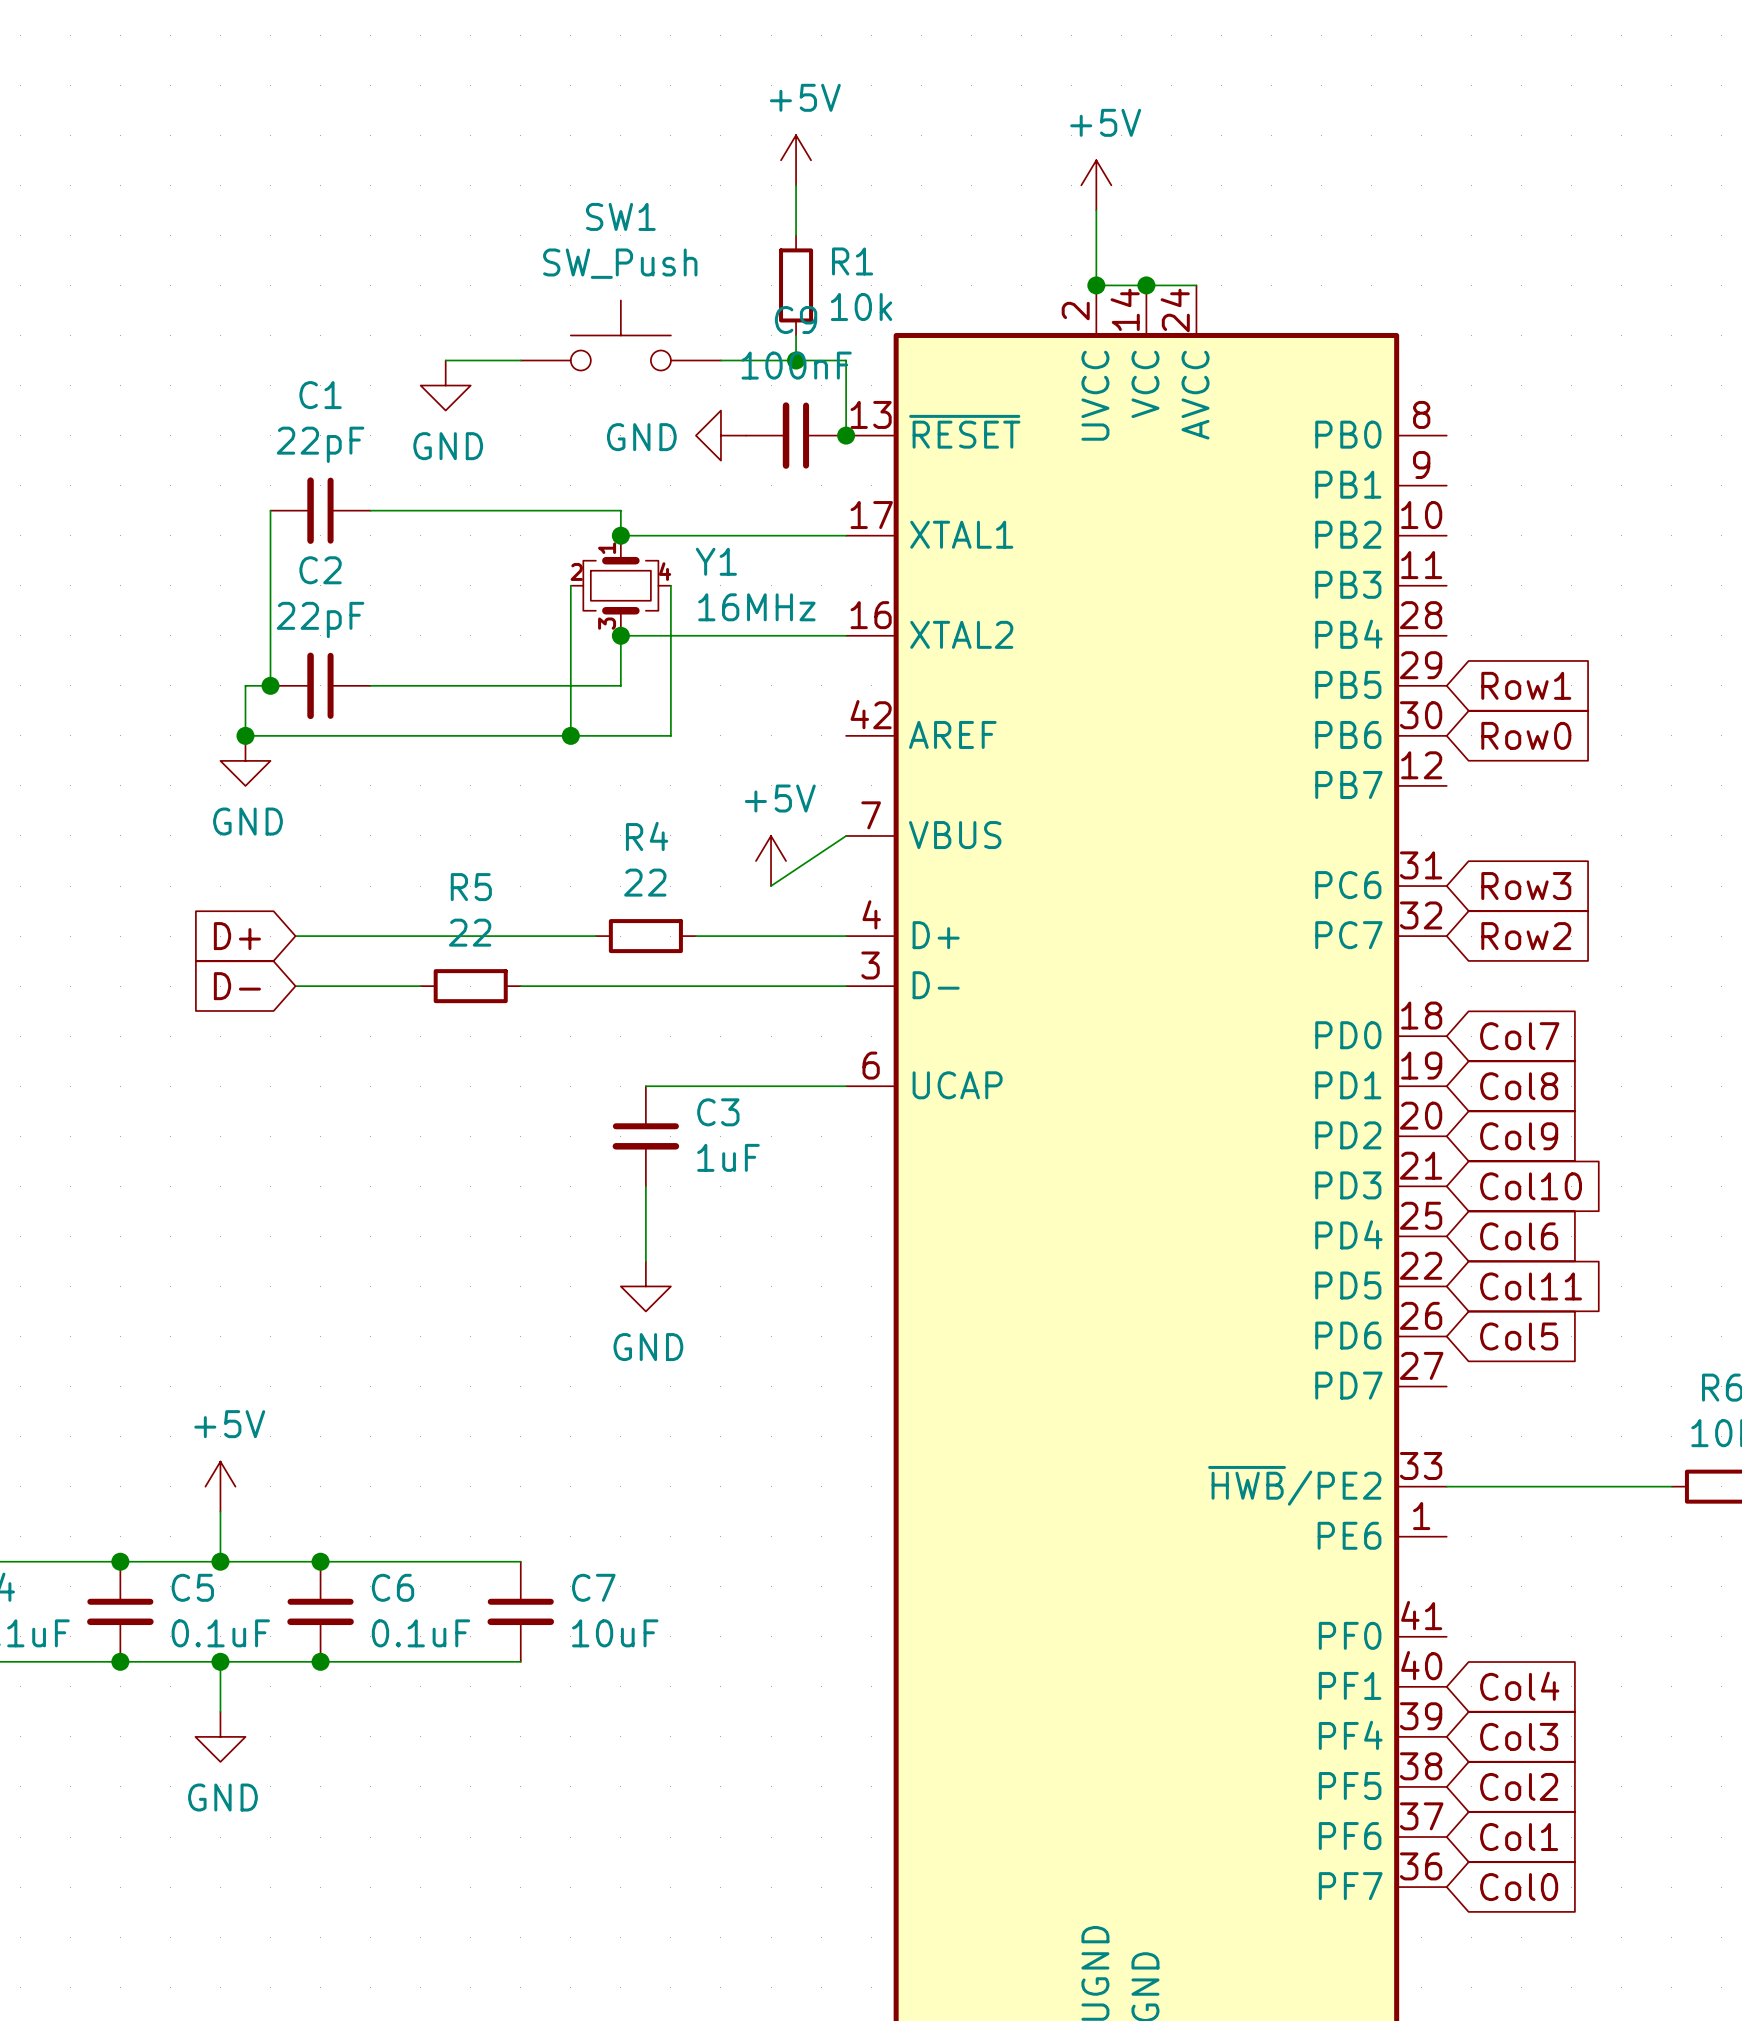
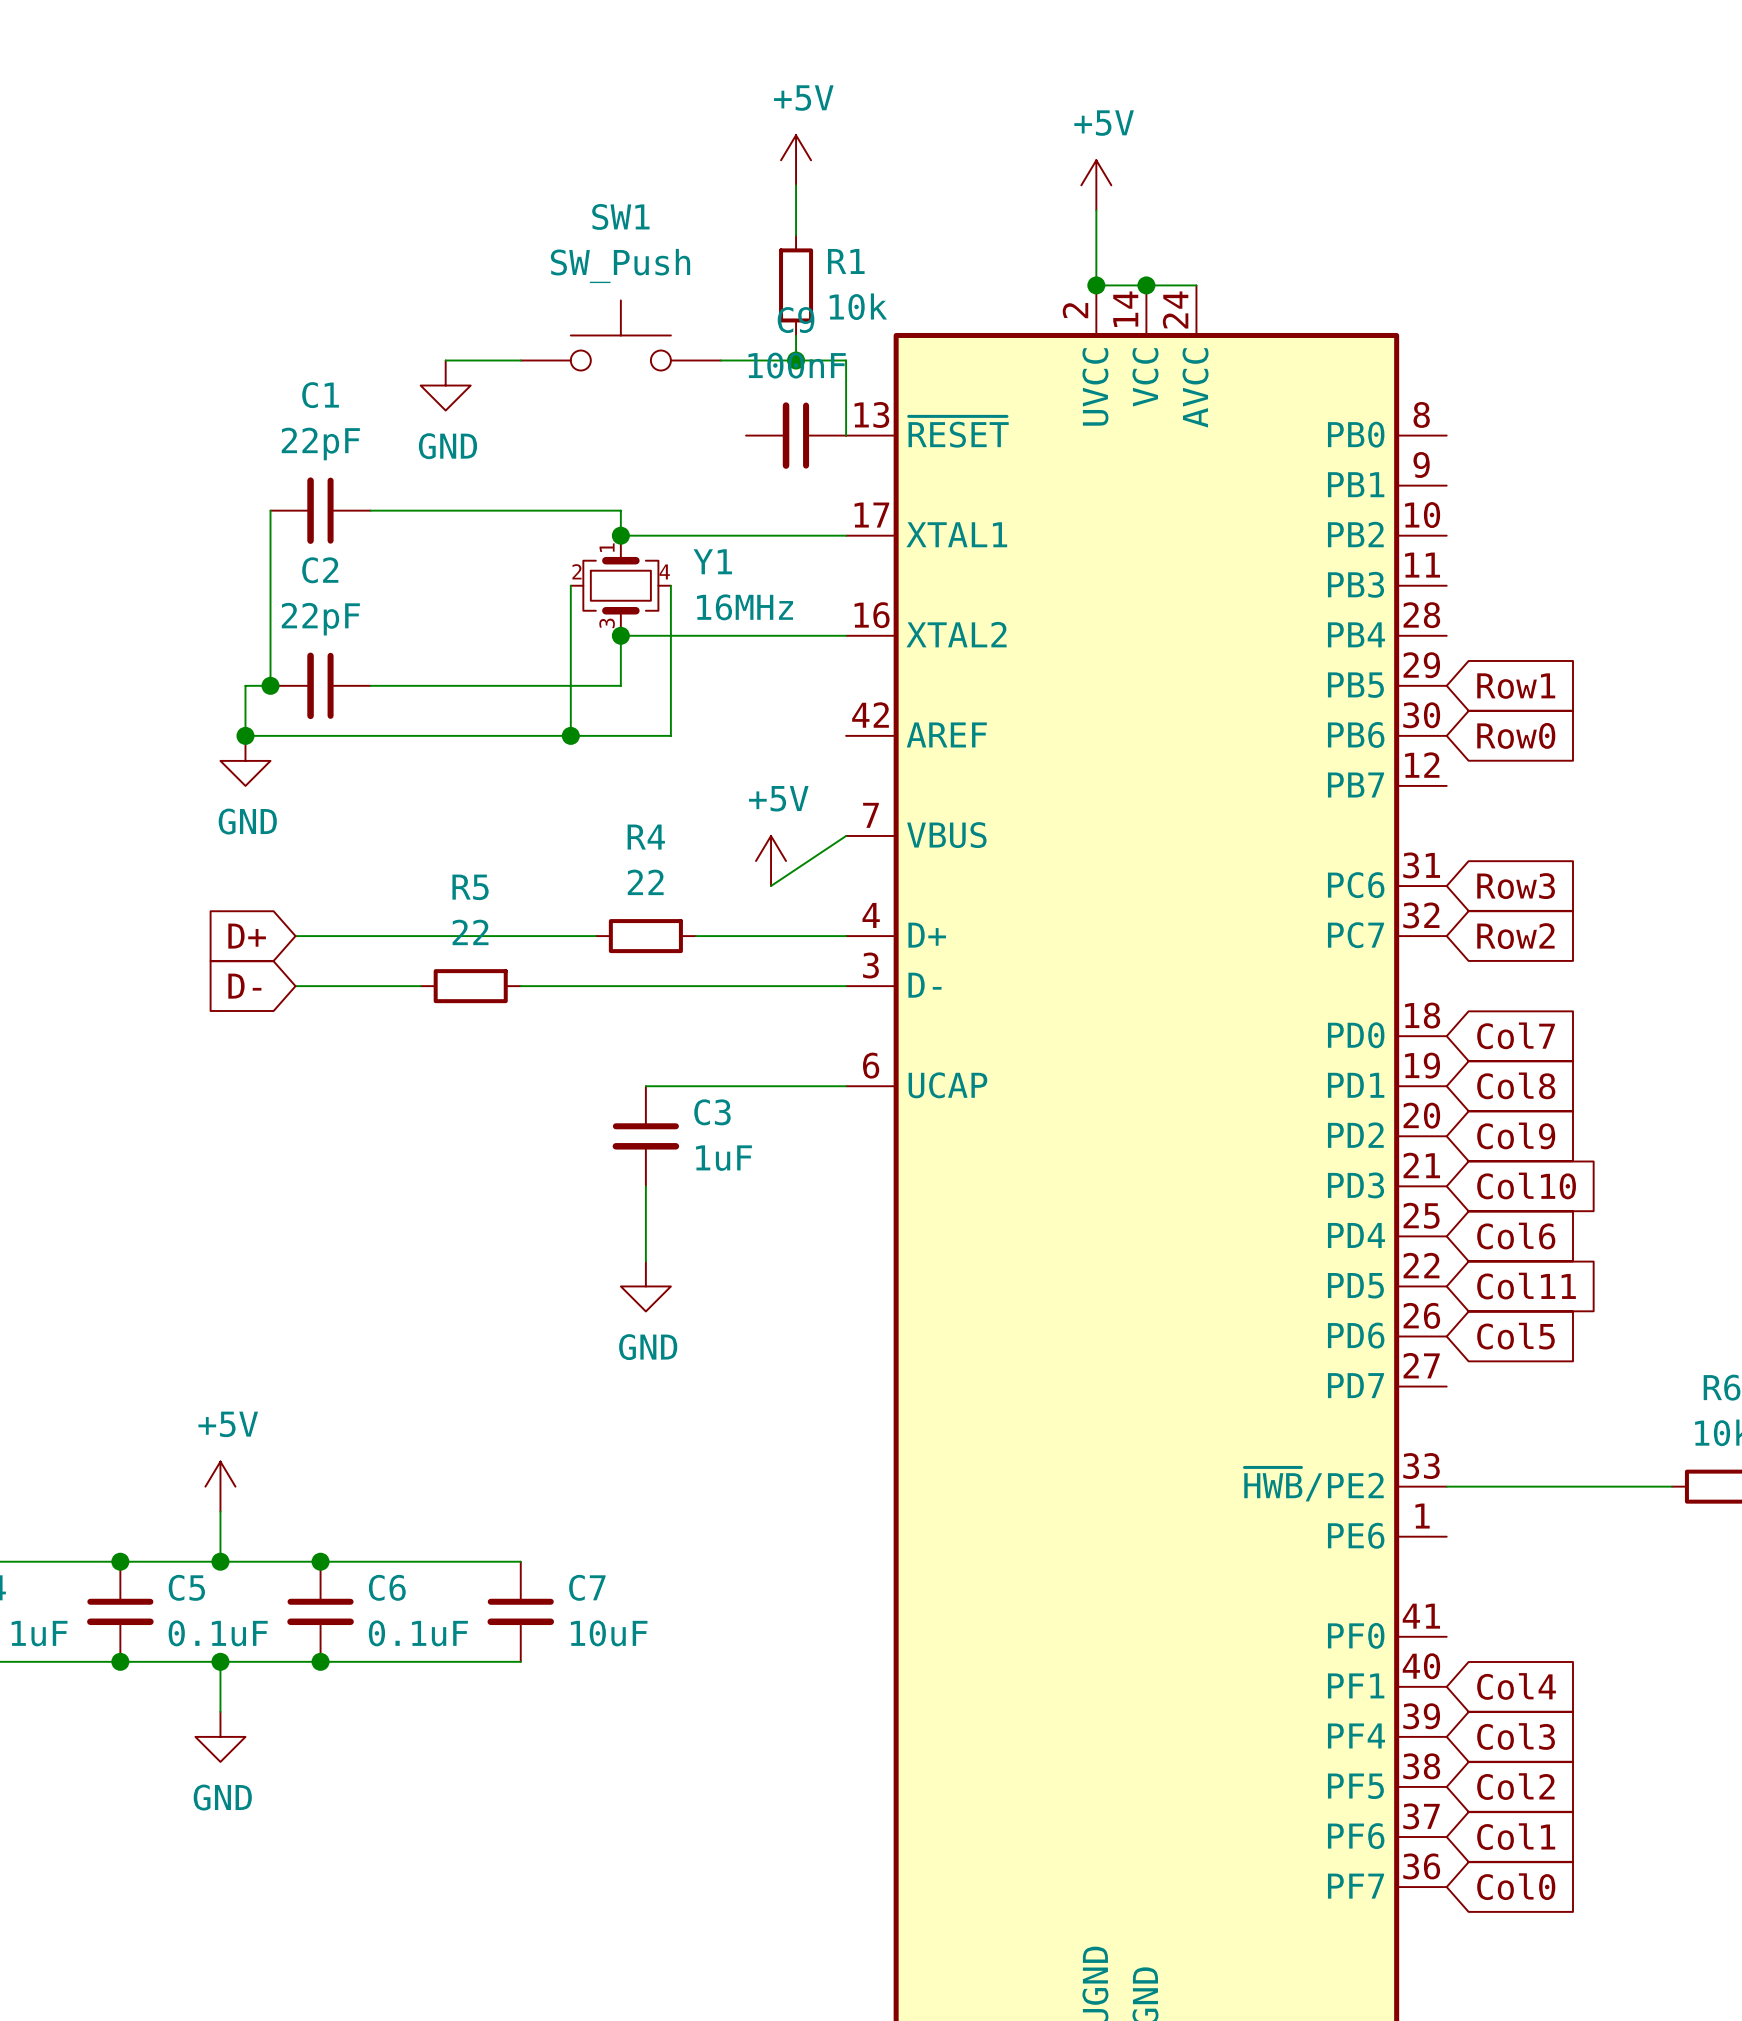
power symbol: GND (720, 435) -> none
junction: (846, 435) -> none

